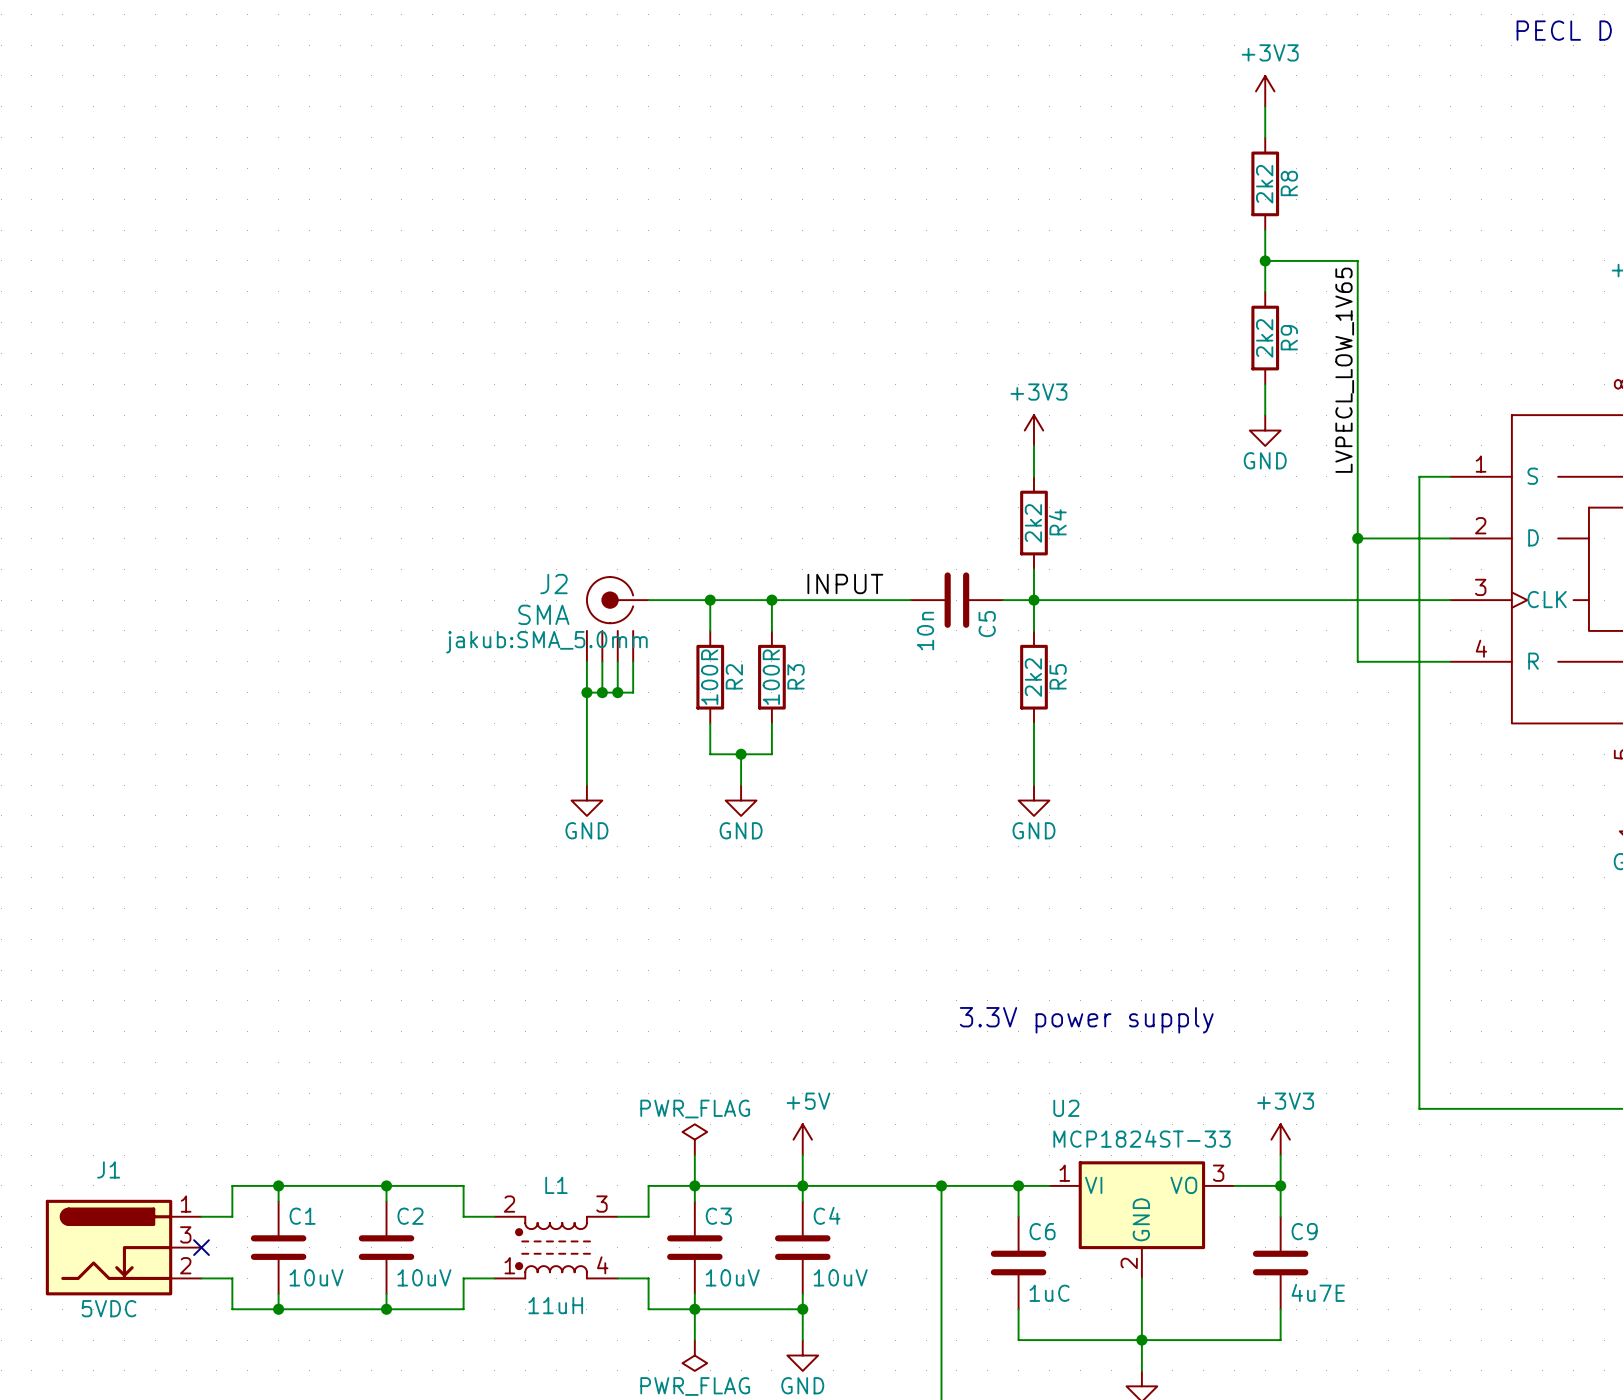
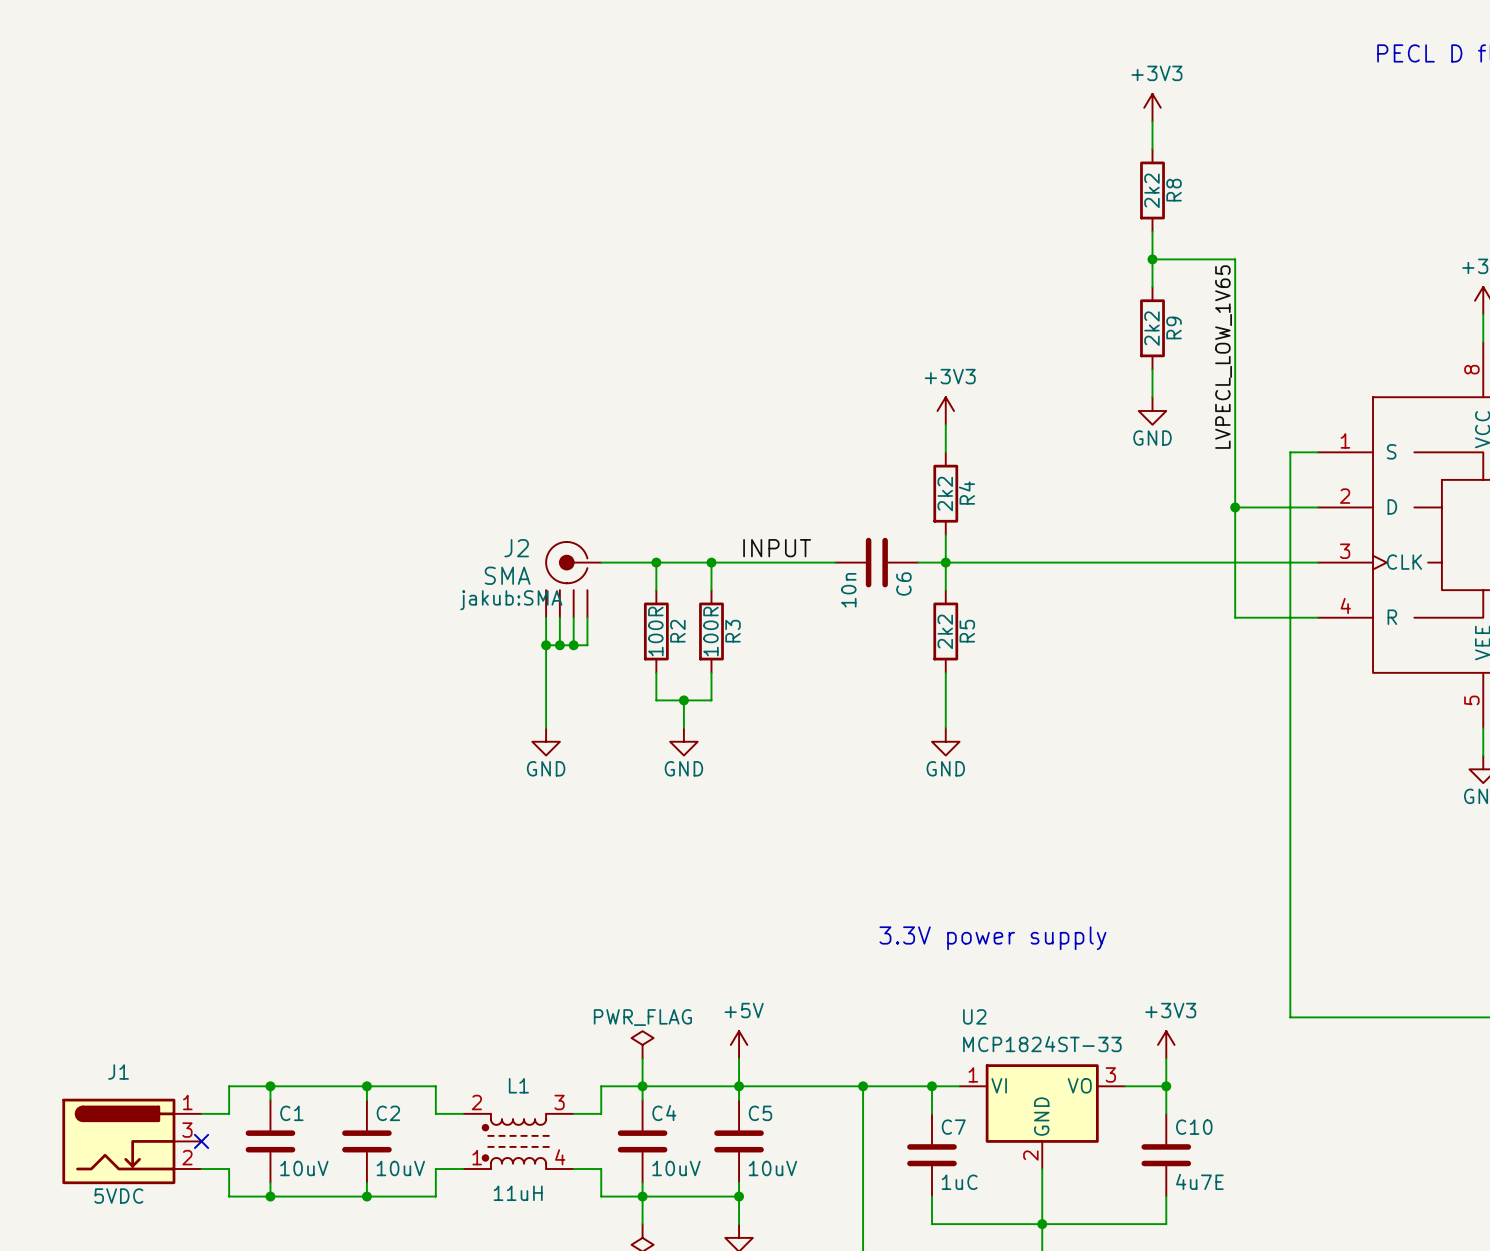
C5 name: C5 (987, 624) -> C6 (903, 584)
J2 text: jakub:SMA_5.0mm (546, 642) -> jakub:SMA (511, 600)
C4 name: C4 (827, 1215) -> C5 (760, 1113)
C3 name: C3 (718, 1216) -> C4 (664, 1113)
C6 name: C6 (1042, 1231) -> C7 (953, 1127)
C9 name: C9 (1304, 1231) -> C10 (1194, 1127)

